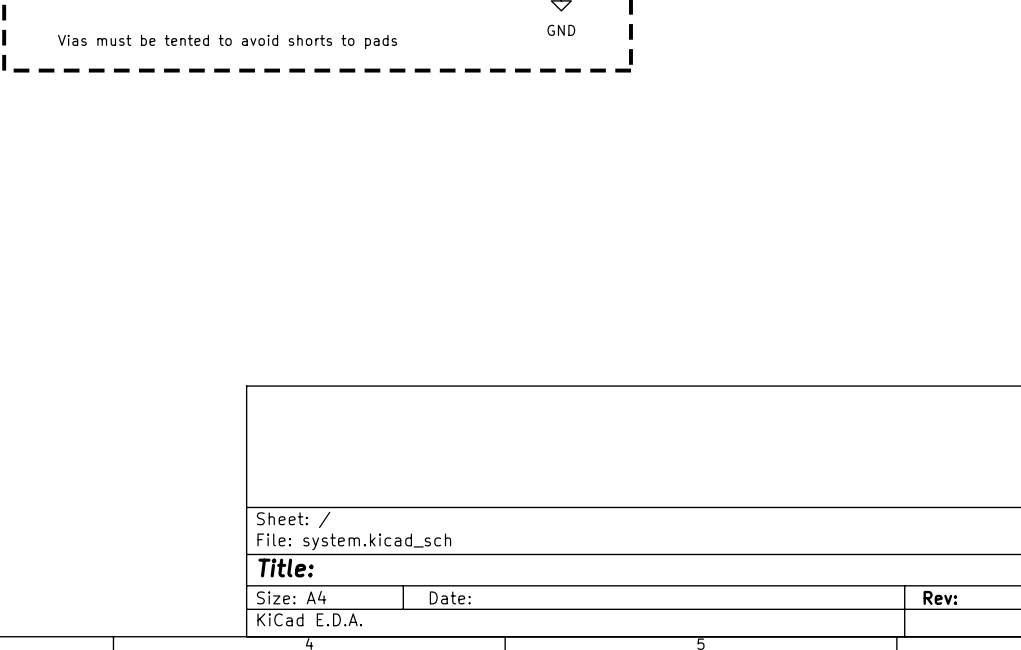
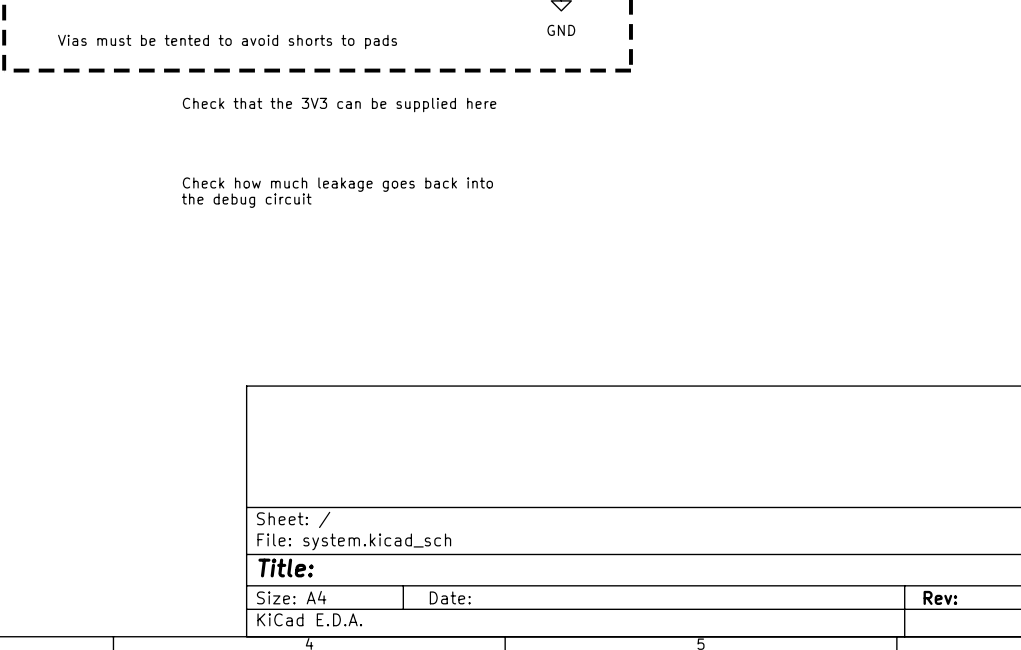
text: none -> Check that the 3V3 can be supplied here (339, 105)
text: none -> Check how much leakage goes back into (337, 184)
text: none -> the debug circuit (246, 200)

